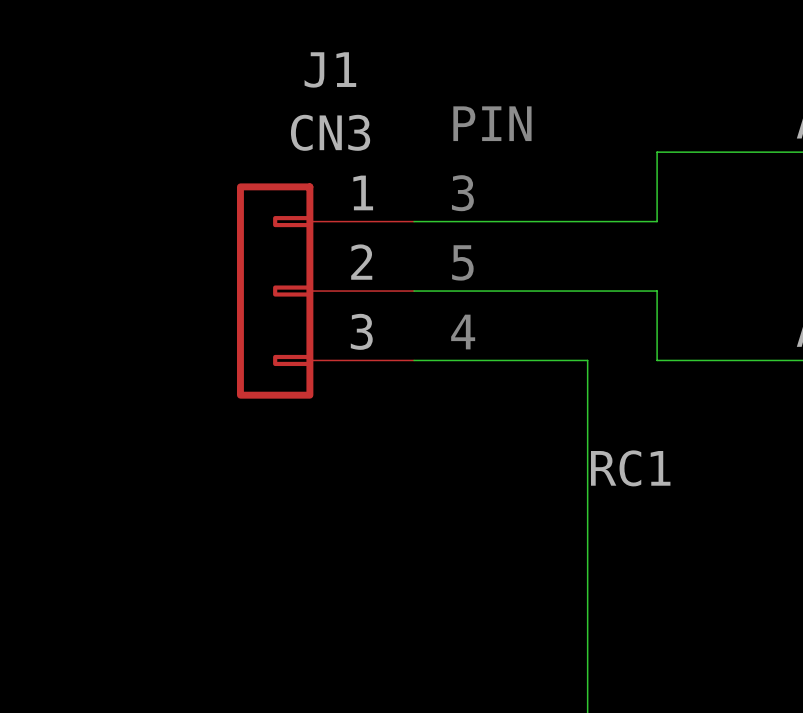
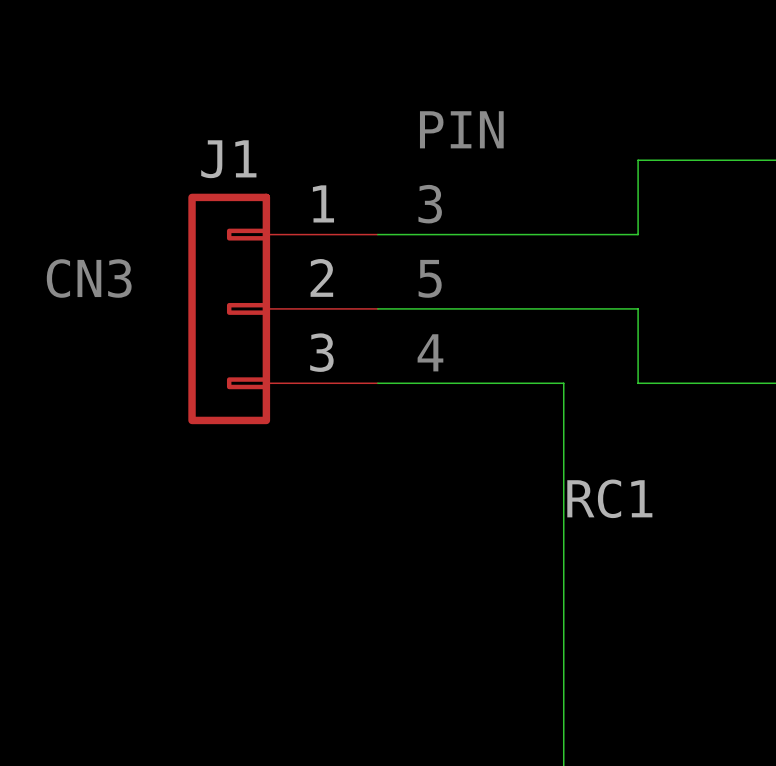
J1 name position: J1 (330, 69) -> J1 (228, 159)
J1 value: CN3 (330, 132) -> none
text: none -> CN3 (89, 278)

